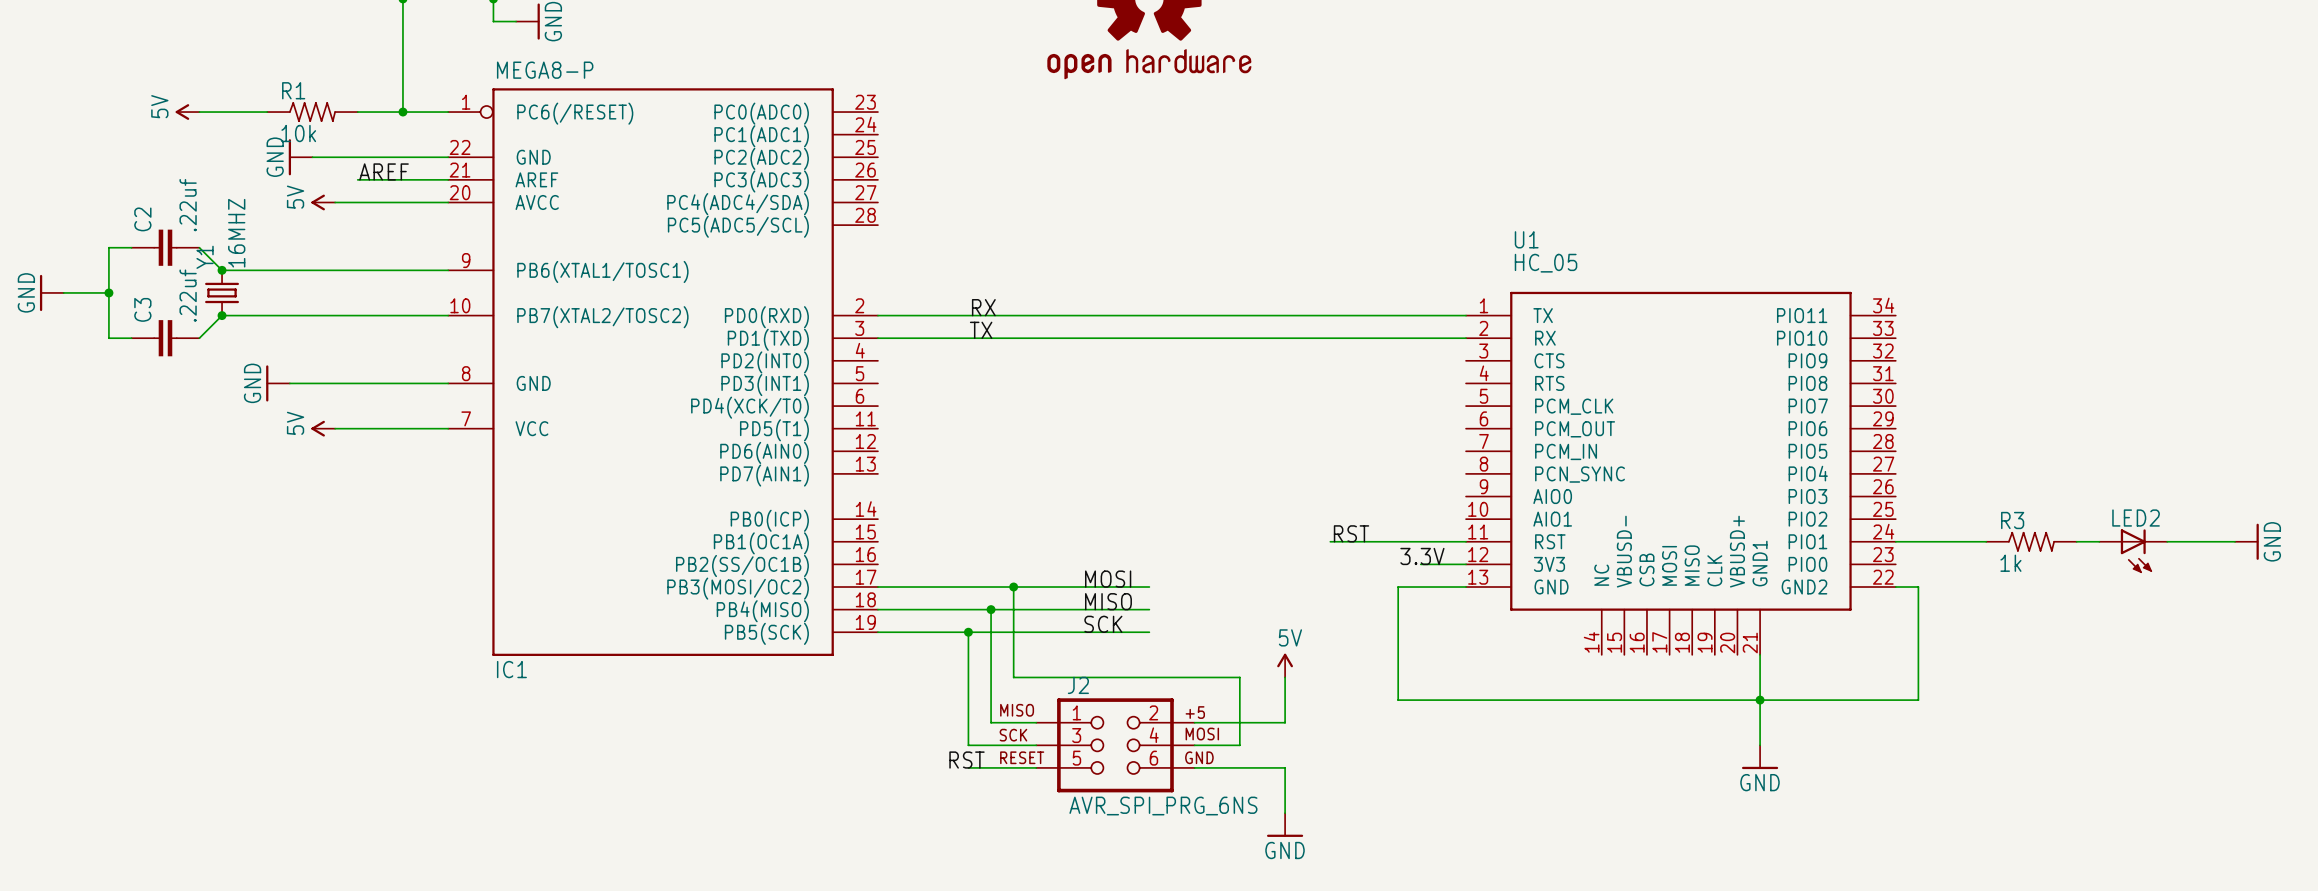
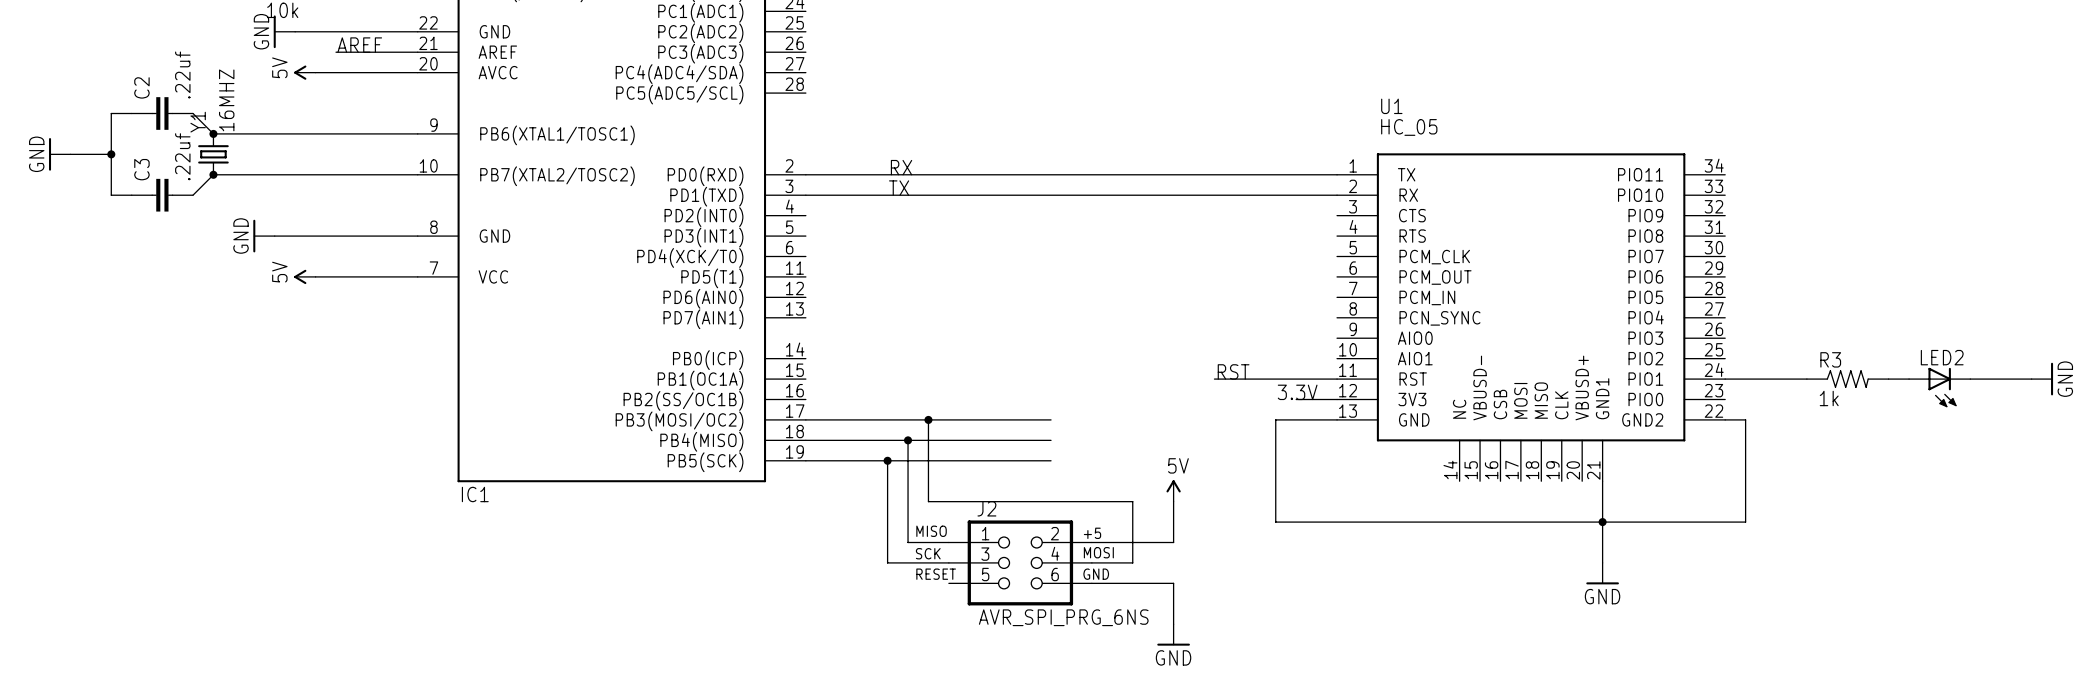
label: MOSI (1108, 579) -> none
label: MISO (1108, 601) -> none
label: SCK (1103, 624) -> none
label: RST (967, 760) -> none
wire: (968, 767) (1036, 767) -> none

